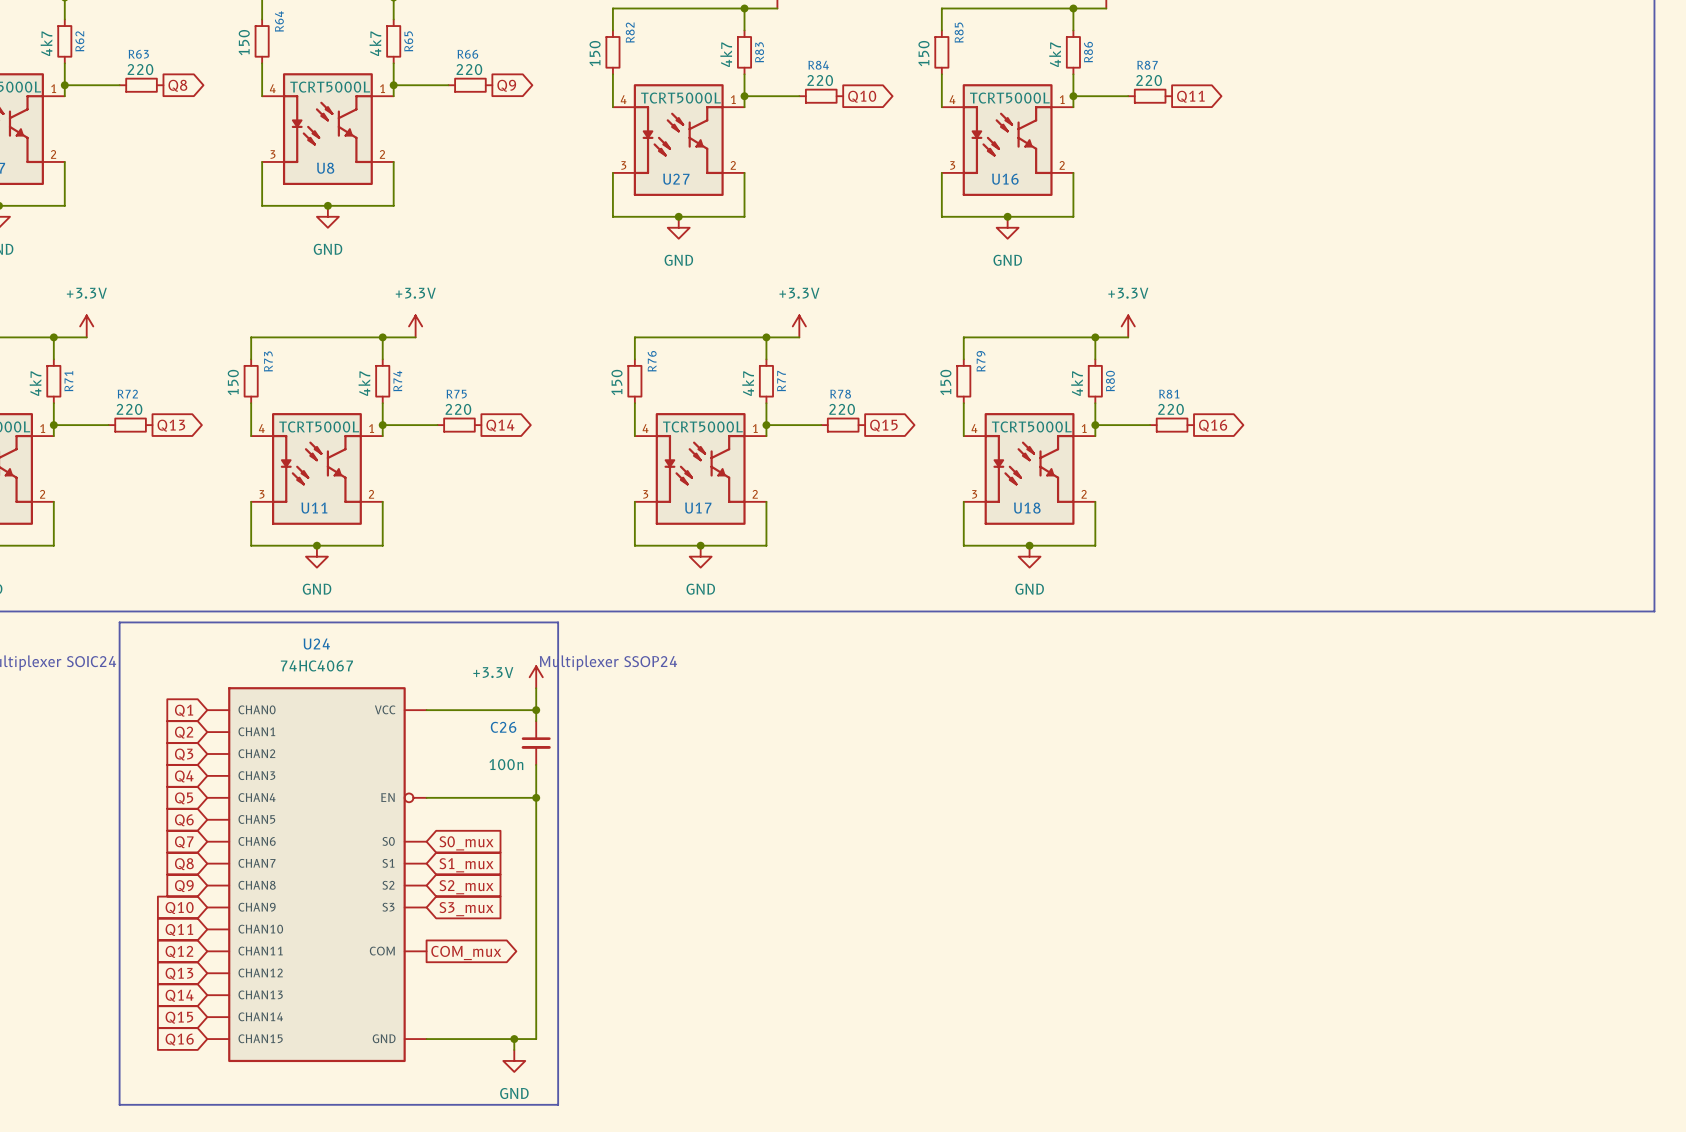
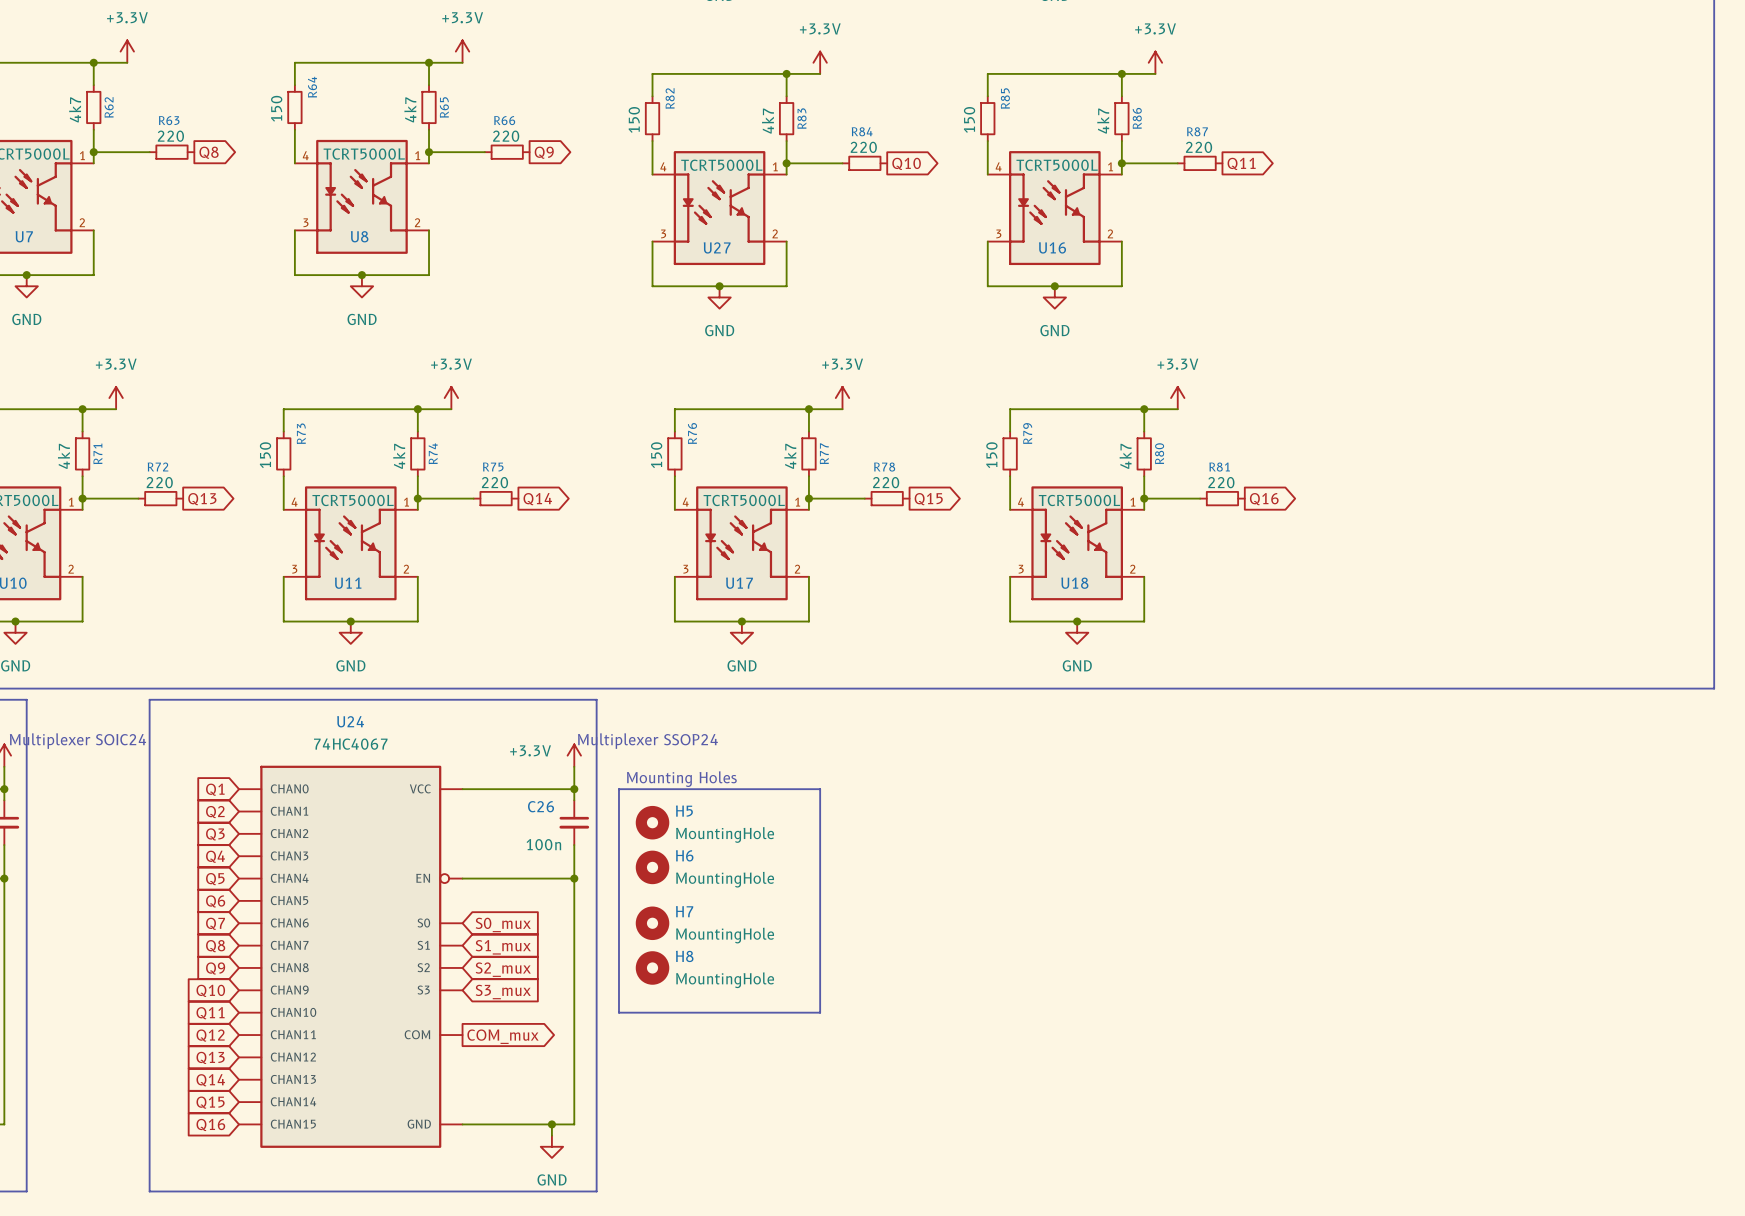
text: none -> Mounting Holes (681, 779)
line: none -> (618, 789) (820, 789) (820, 1012) (618, 1012) (618, 789)
H5: none -> MountingHole (652, 822)
H6: none -> MountingHole (652, 867)
H7: none -> MountingHole (652, 923)
H8: none -> MountingHole (652, 967)

